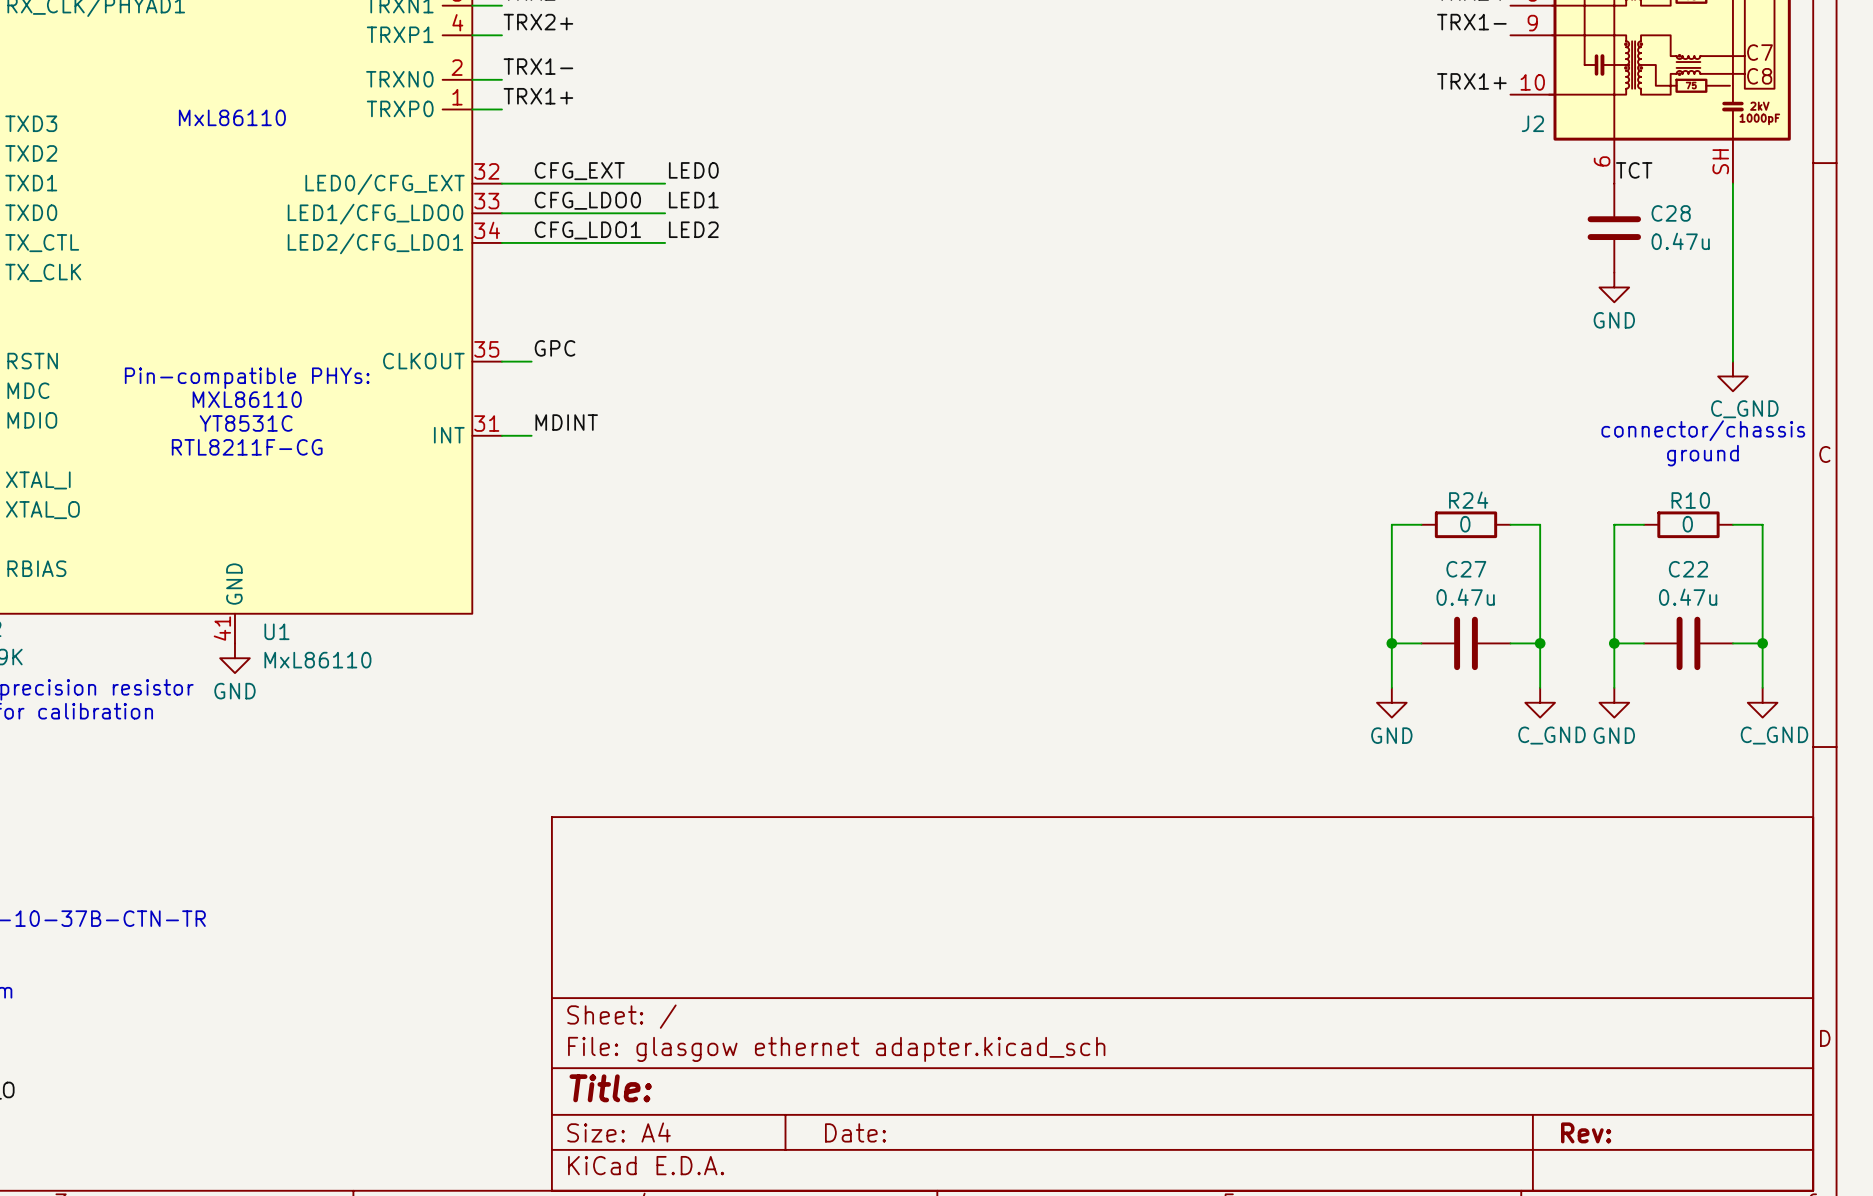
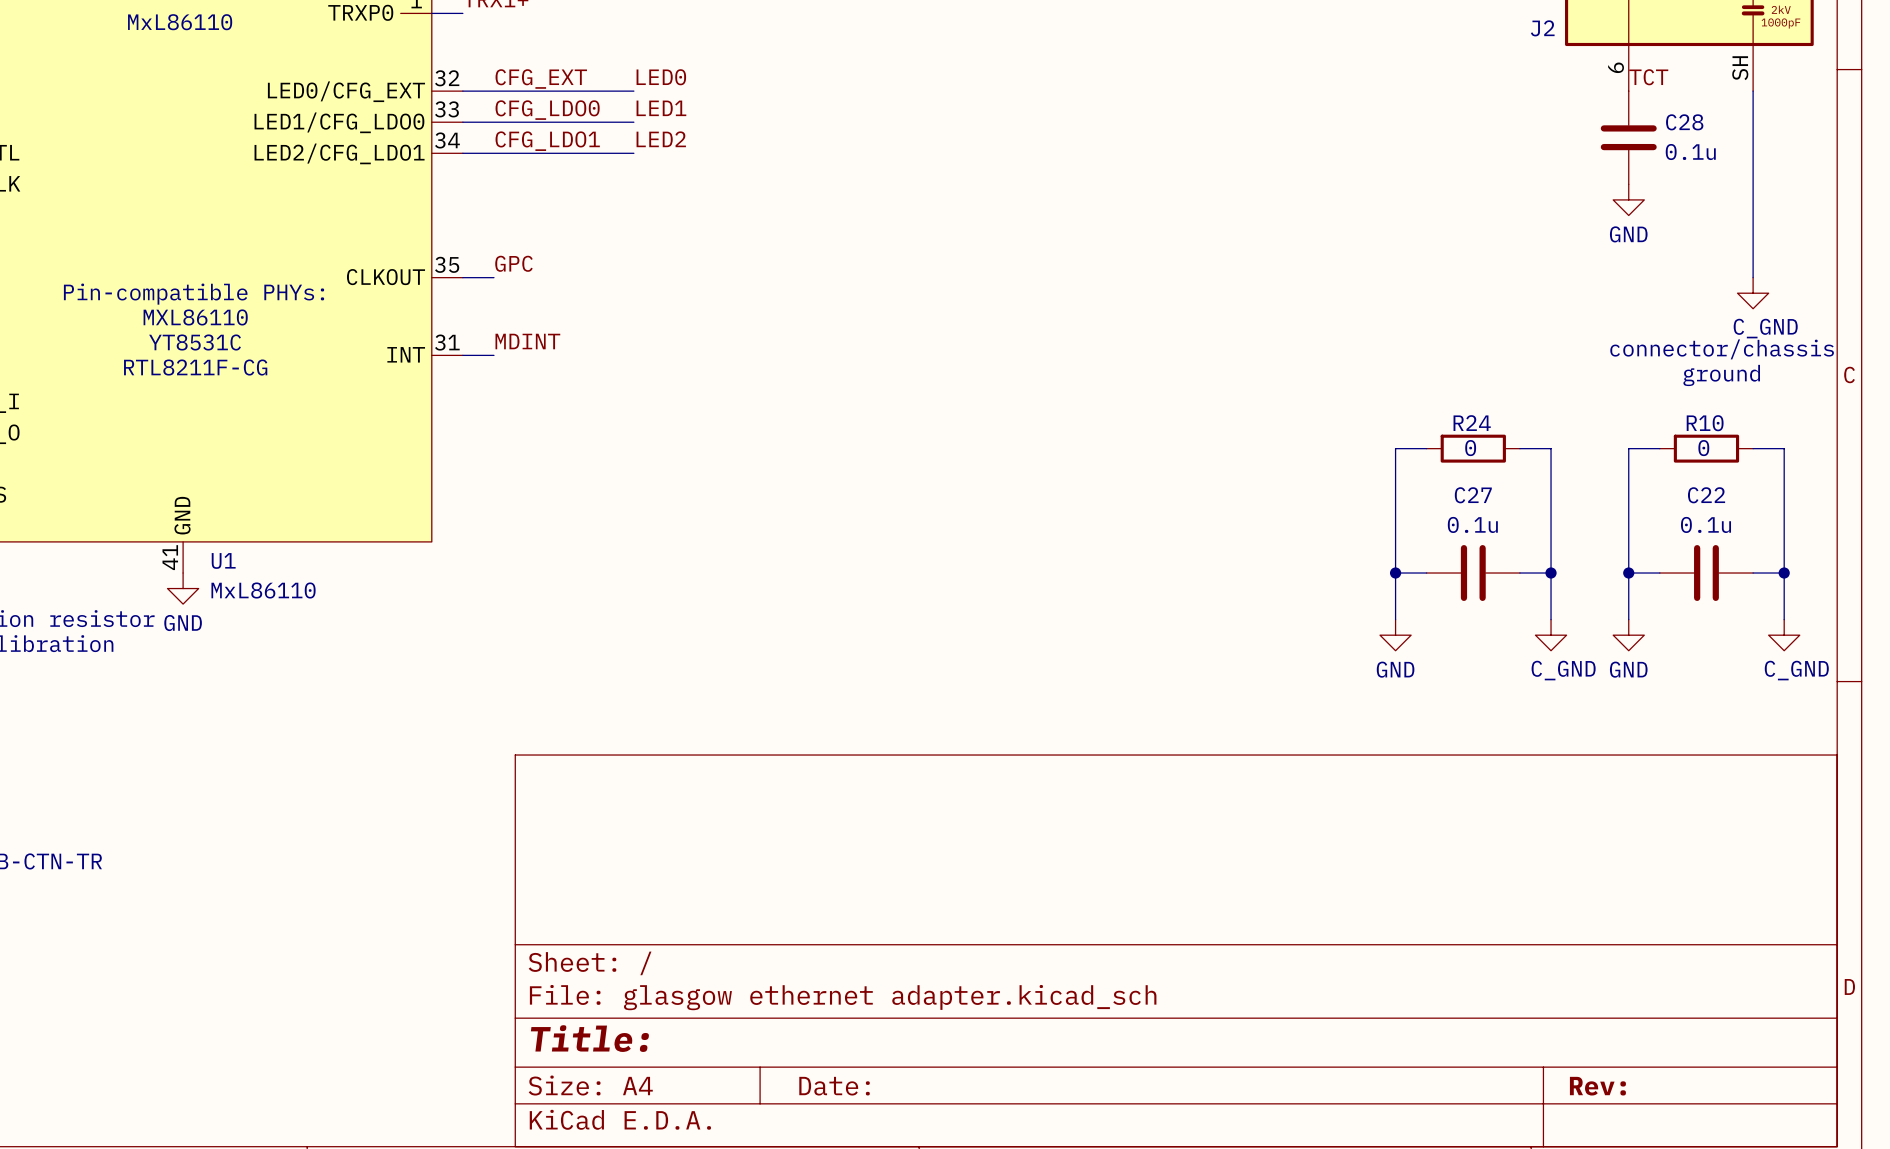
C28 value: 0.47u (1680, 241) -> 0.1u (1690, 152)
C27 value: 0.47u (1465, 597) -> 0.1u (1472, 524)
C22 value: 0.47u (1688, 597) -> 0.1u (1706, 524)

